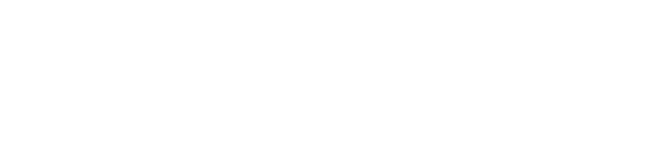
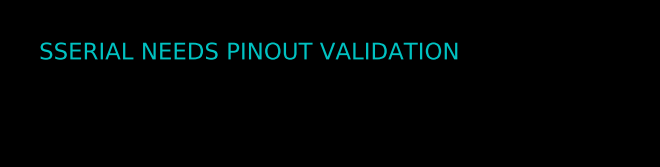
text: none -> SSERIAL NEEDS PINOUT VALIDATION (248, 51)

